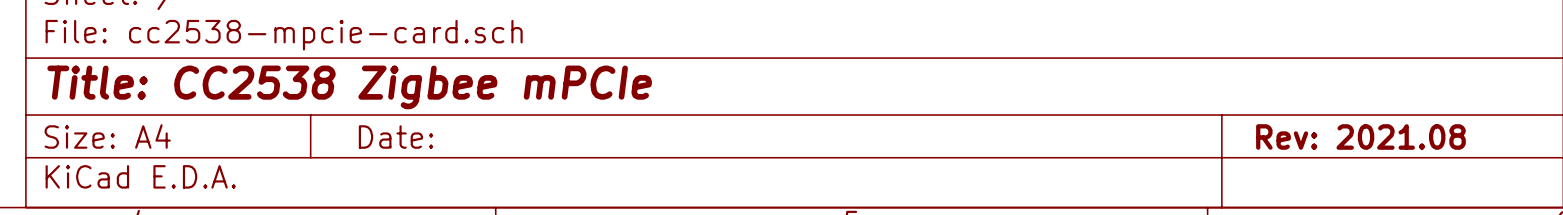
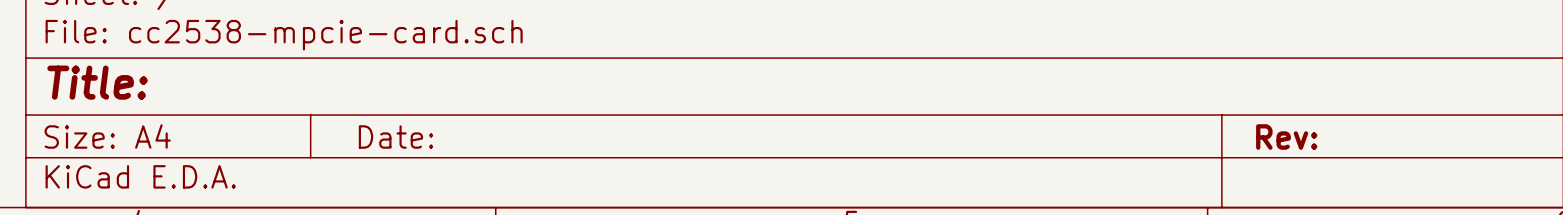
title block: Title: CC2538 Zigbee mPCIe (349, 87) -> Title: (97, 82)
title block: Rev: 2021.08 (1360, 137) -> Rev: (1286, 137)

